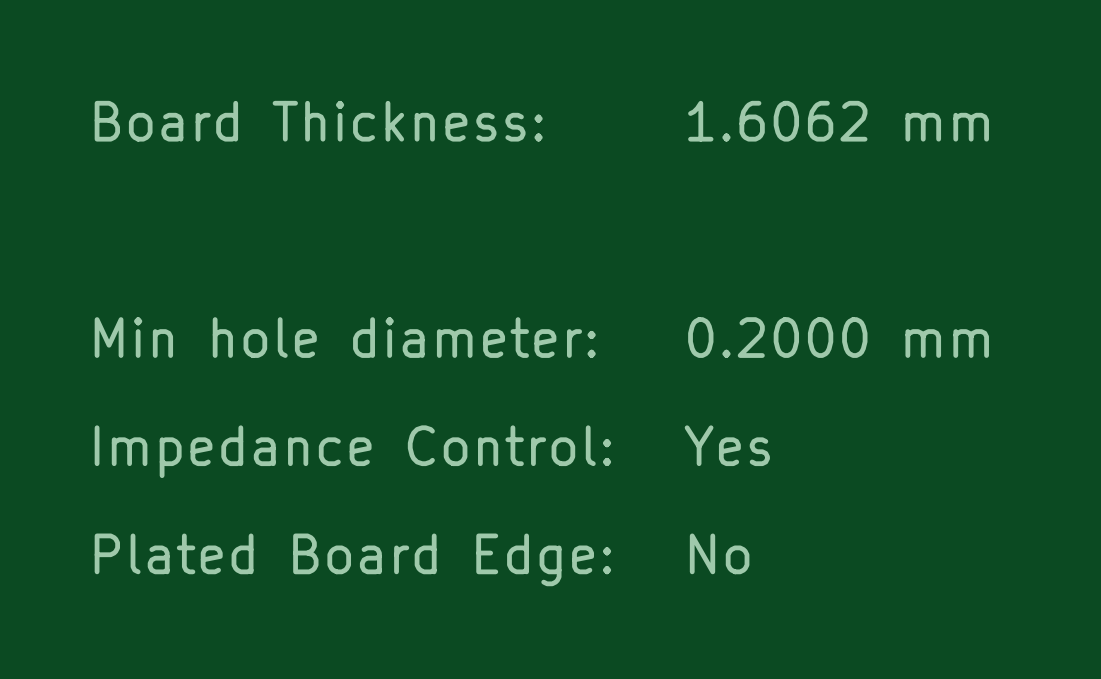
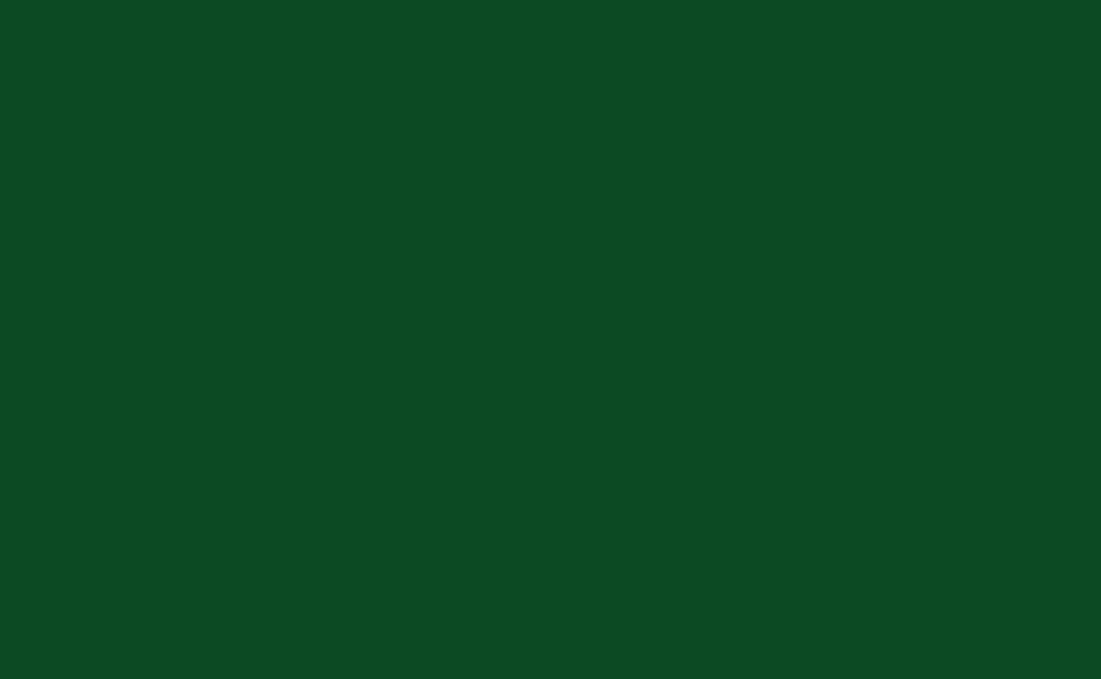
text: Board Thickness: (318, 121) -> none
text: 1.6062 mm (838, 121) -> none
text: Min hole diameter: (345, 337) -> none
text: 0.2000 mm (838, 337) -> none
text: Yes (727, 445) -> none
text: Impedance Control: (352, 451) -> none
text: No (719, 553) -> none
text: Plated Board Edge: (352, 559) -> none

